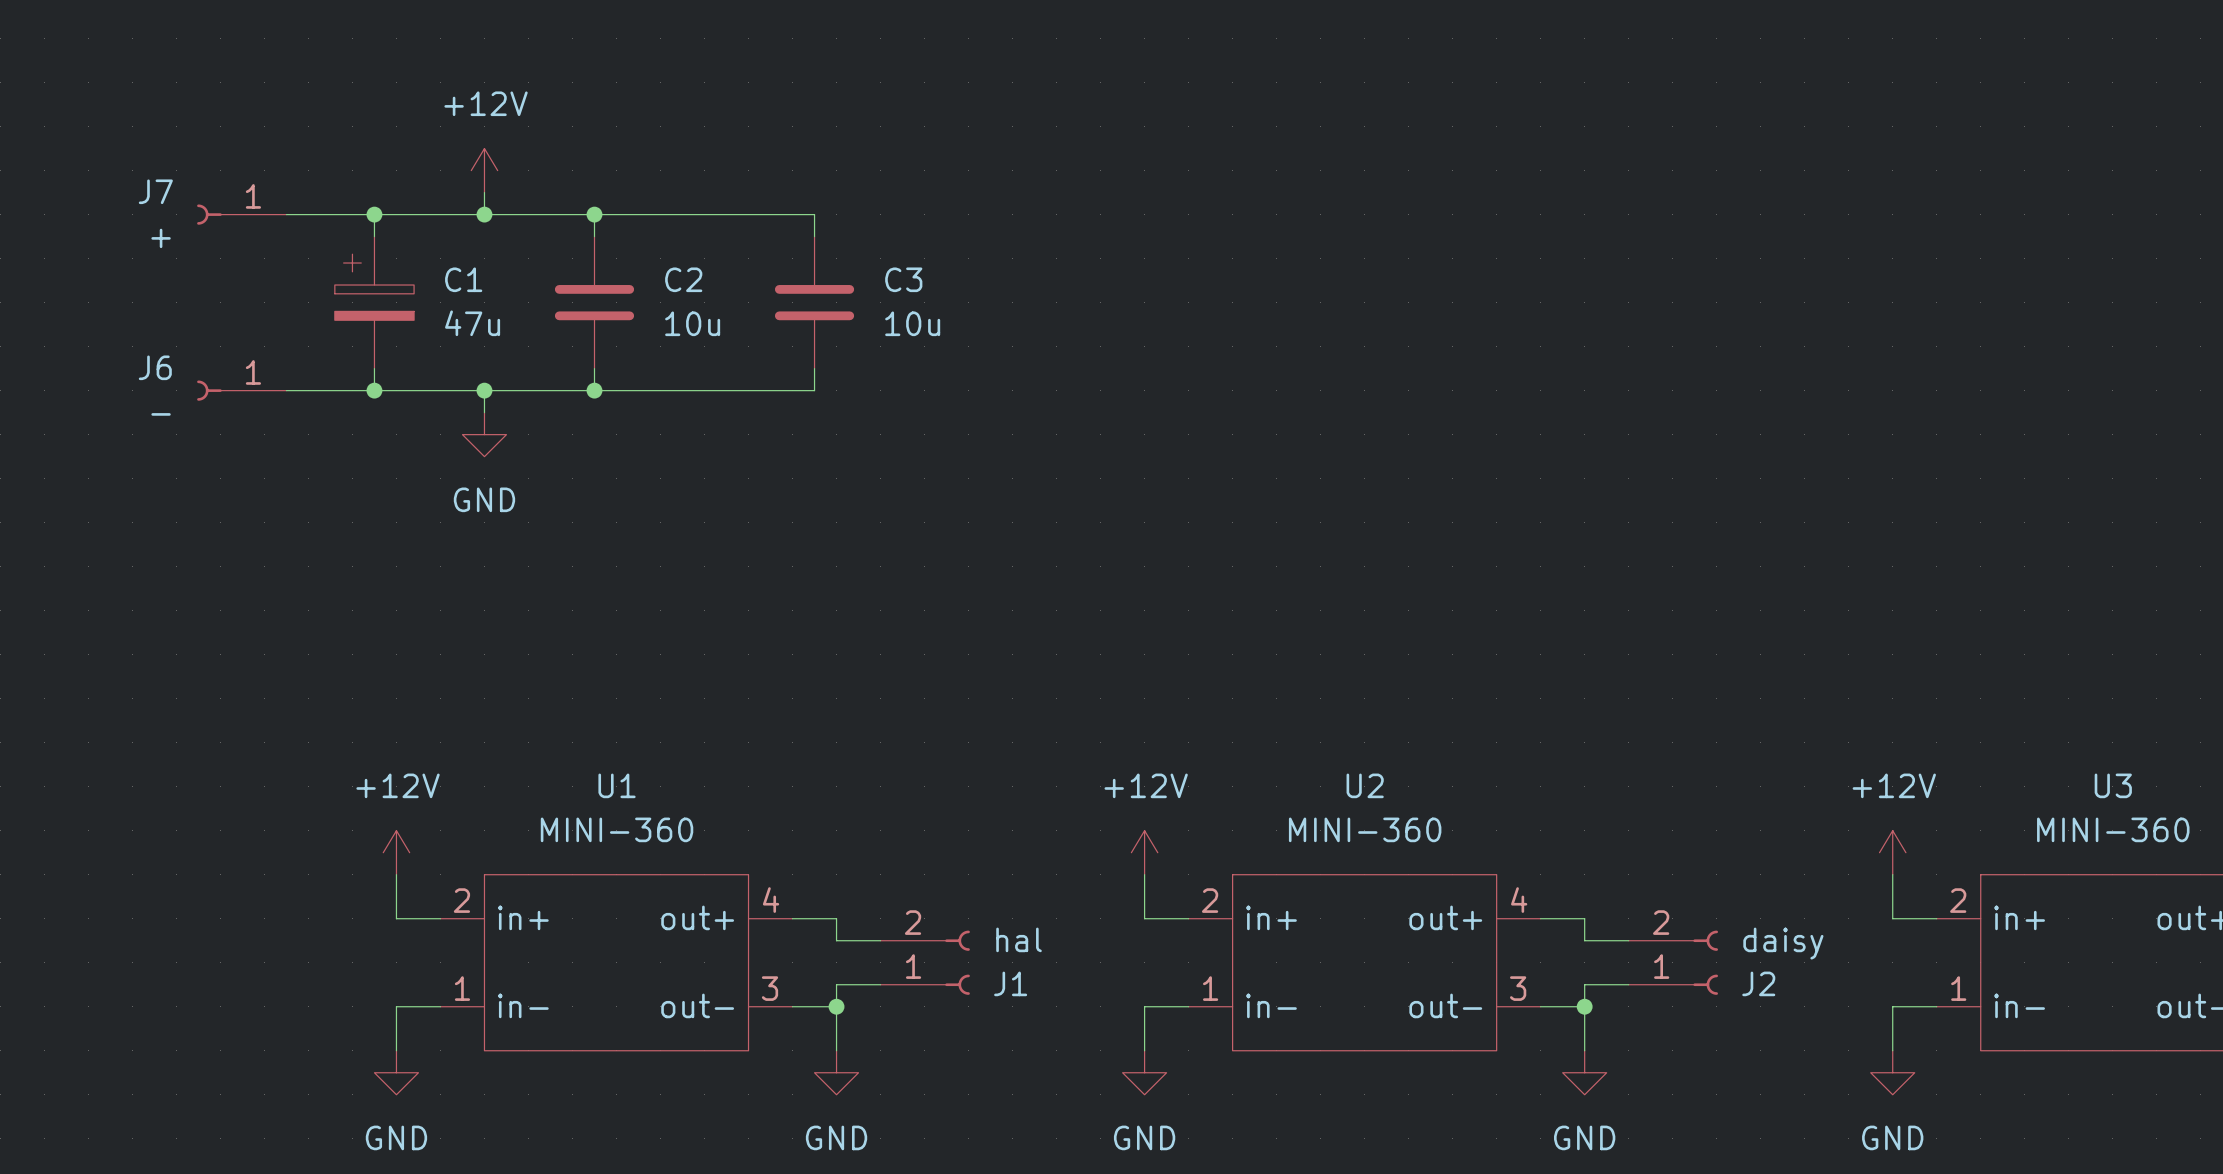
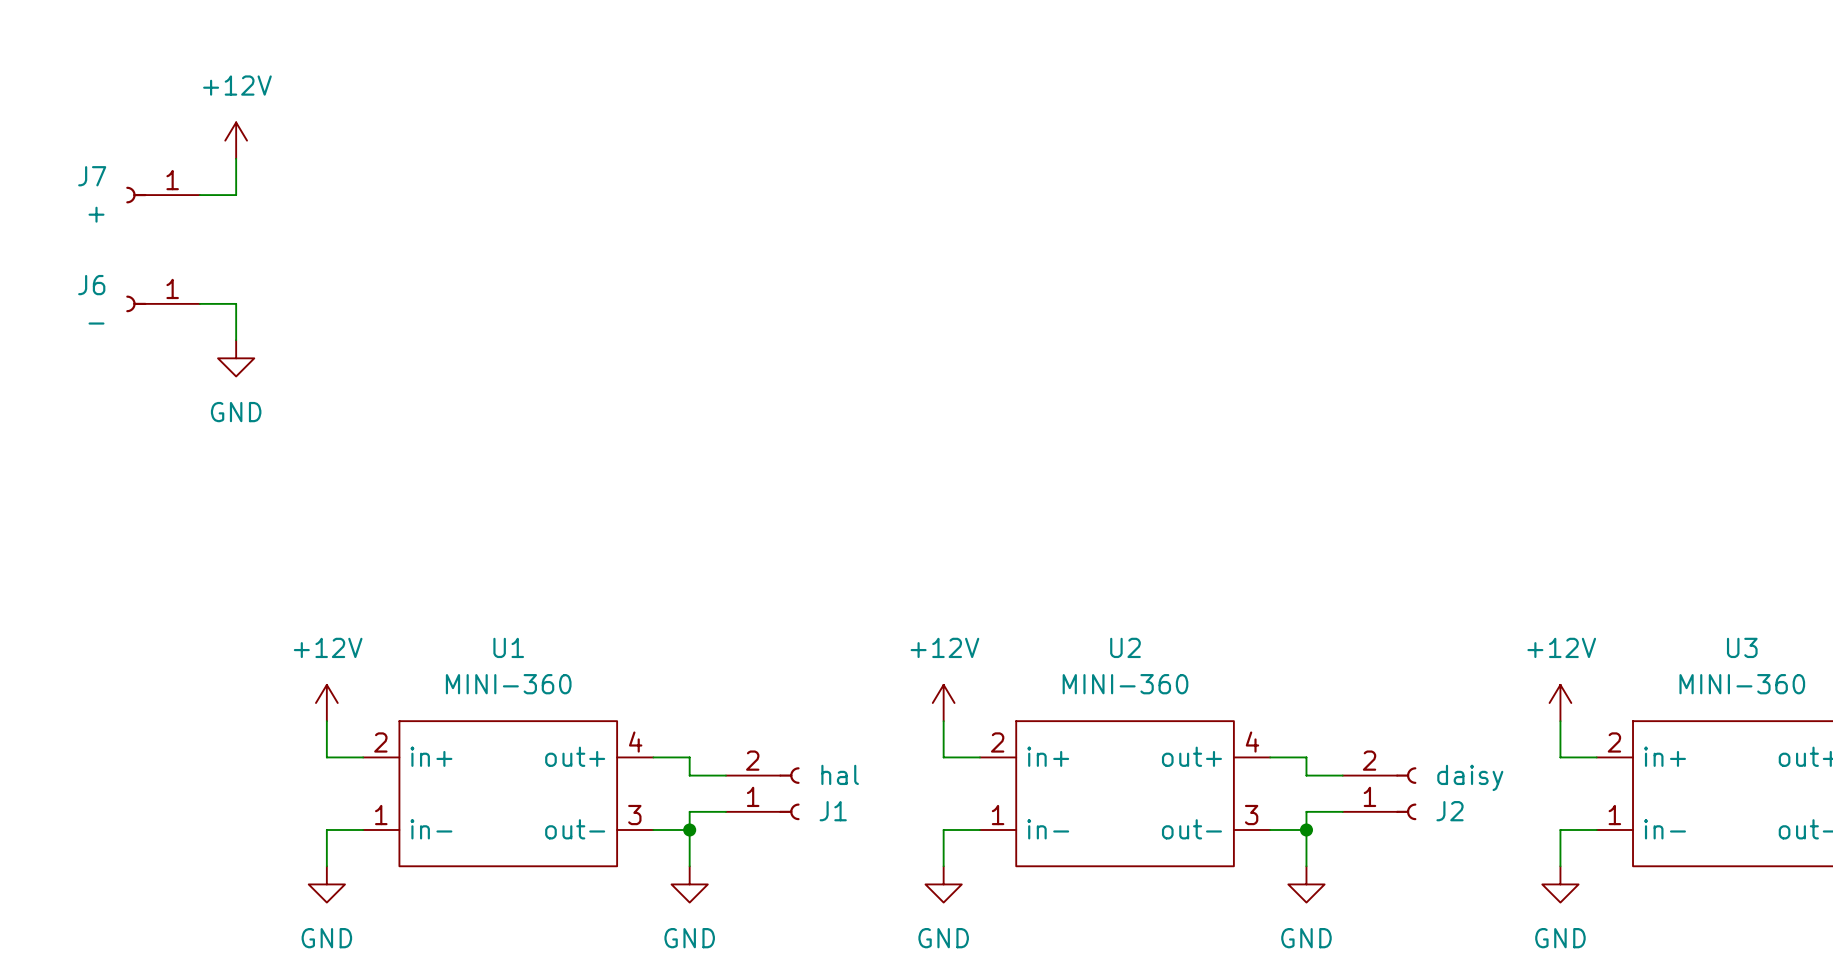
power symbol position: +12V (484, 170) -> +12V (236, 140)
wire: none -> (236, 158) (236, 195) (199, 195)
wire: (484, 192) (484, 214) -> none
J7 position: (241, 214) -> (163, 195)
wire: (286, 214) (814, 214) (814, 236) -> none
wire: (374, 214) (374, 236) -> none
junction: (374, 214) -> none
junction: (484, 214) -> none
wire: (594, 214) (594, 236) -> none
junction: (594, 214) -> none
C1: 47u (374, 302) -> none
C2: 10u (594, 302) -> none
C3: 10u (814, 302) -> none
wire: none -> (199, 303) (236, 303) (236, 340)
wire: (374, 368) (374, 390) -> none
wire: (594, 368) (594, 390) -> none
wire: (814, 368) (814, 390) (286, 390) -> none
J6 position: (241, 390) -> (163, 303)
junction: (374, 390) -> none
wire: (484, 390) (484, 412) -> none
junction: (484, 390) -> none
junction: (594, 390) -> none
power symbol position: GND (484, 434) -> GND (236, 358)

